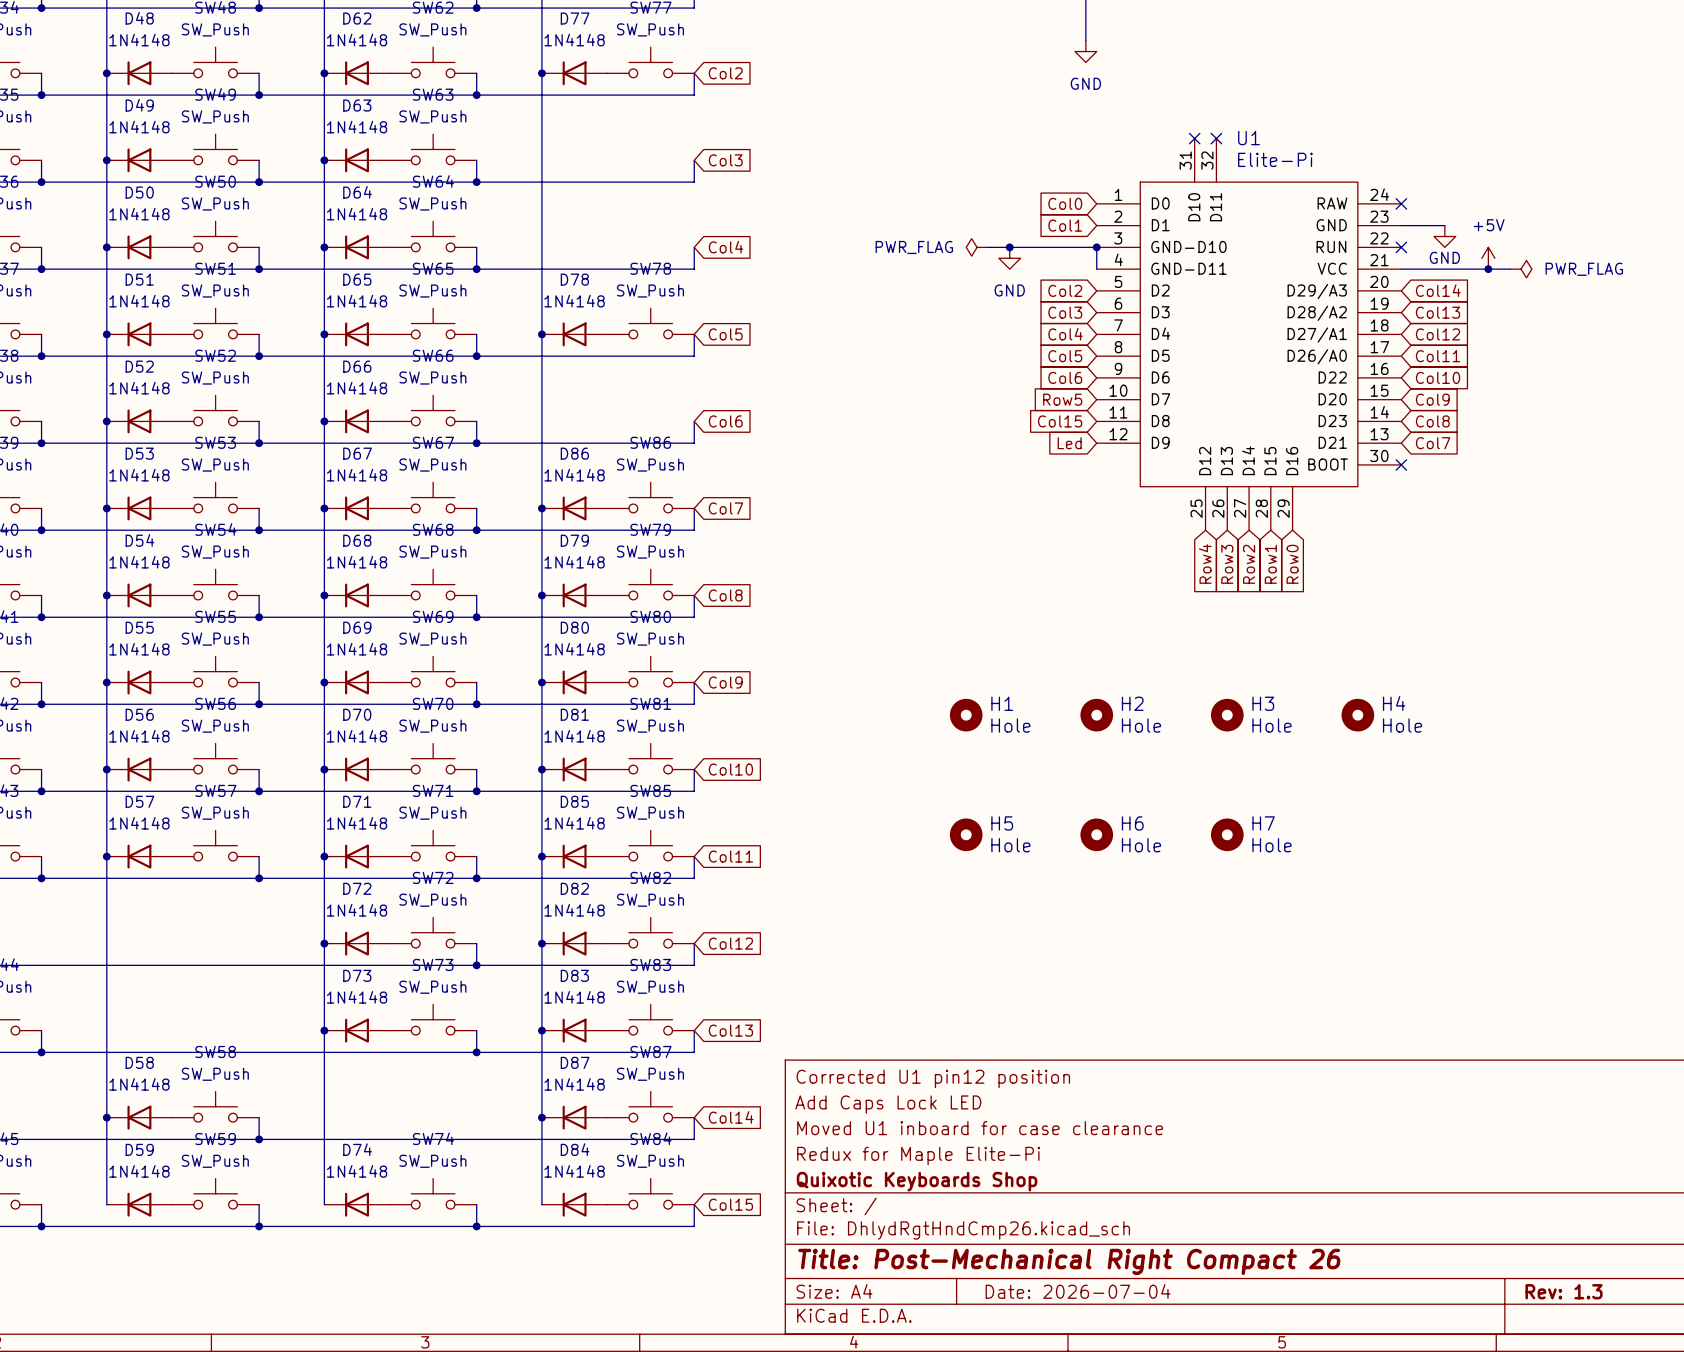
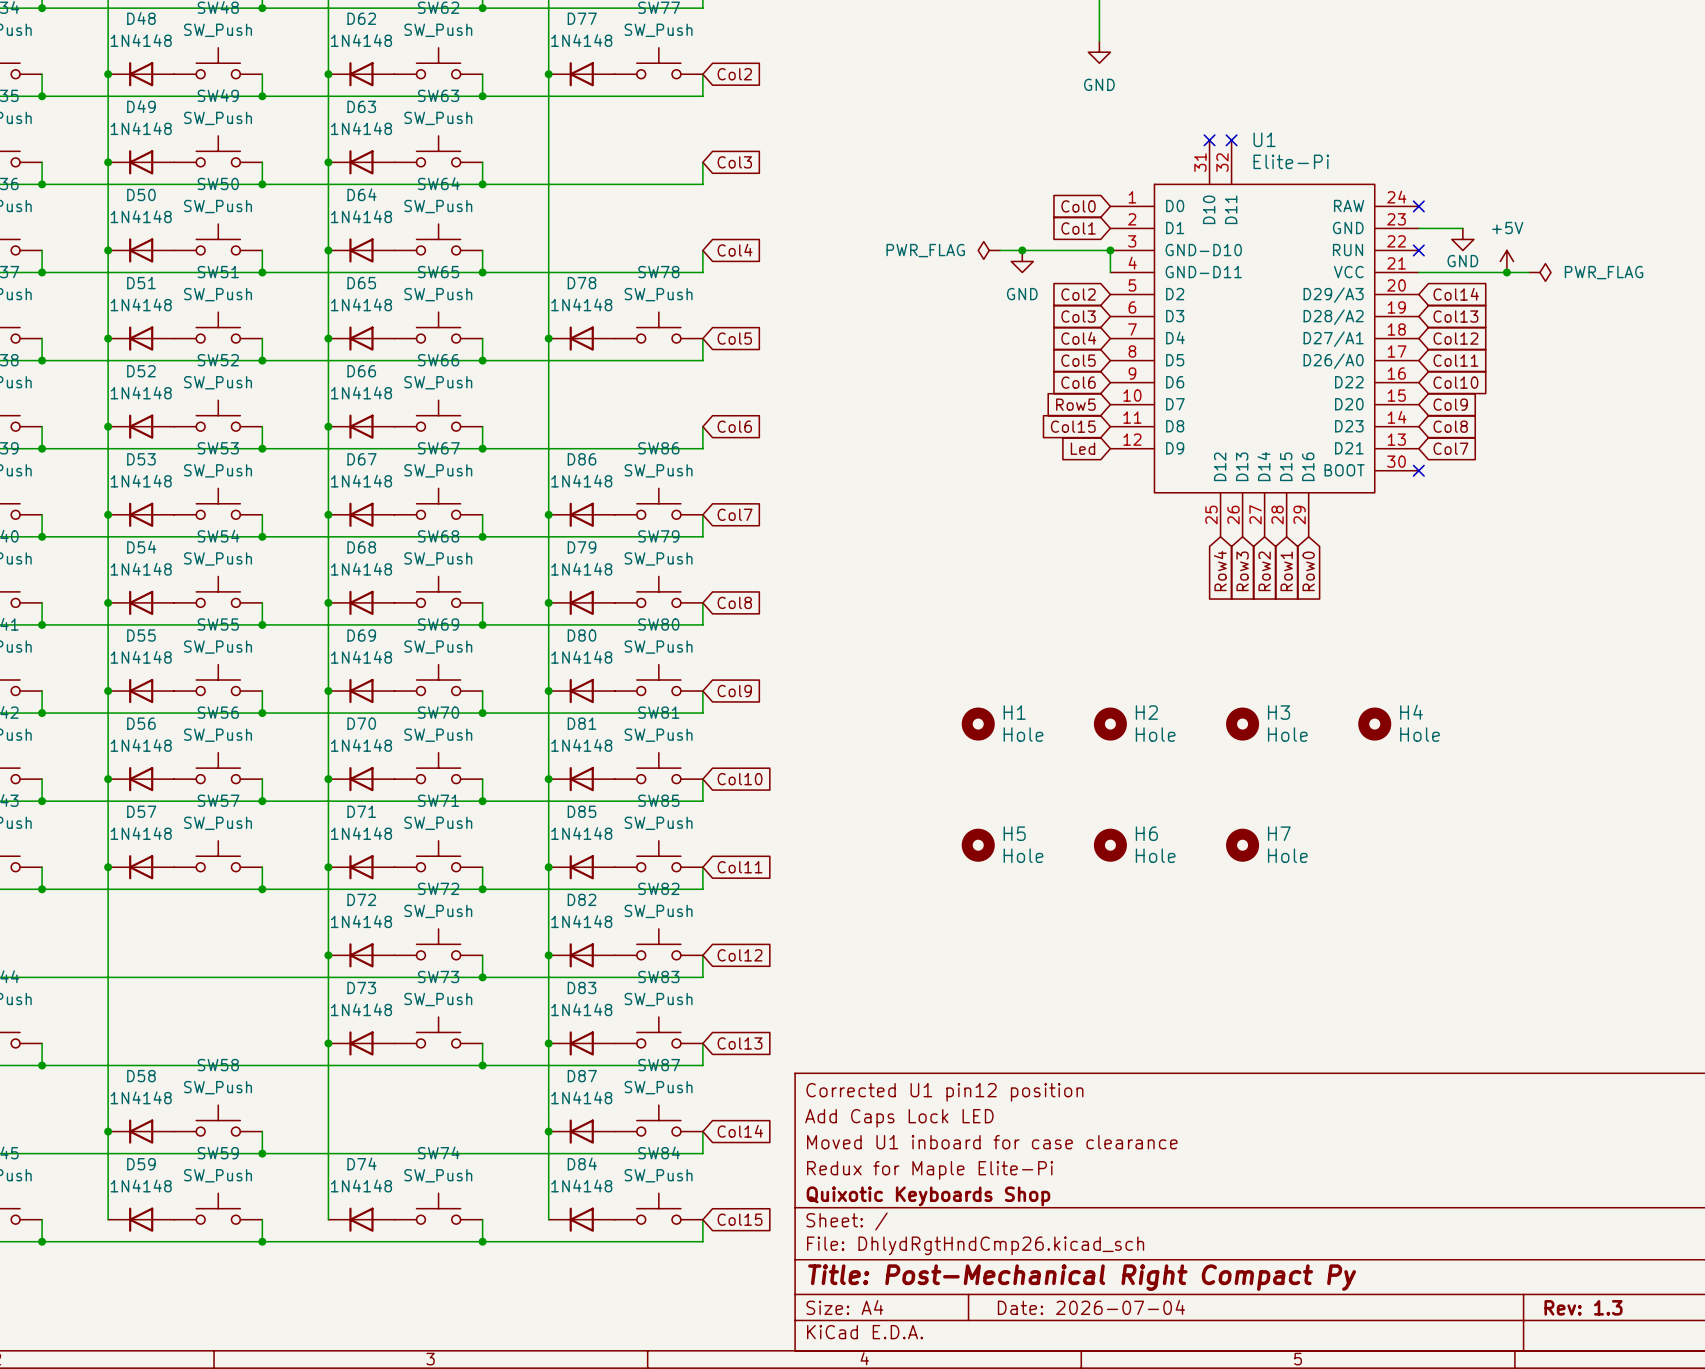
title block: Title: Post-Mechanical Right Compact 26 (1069, 1261) -> Title: Post-Mechanical Right Compact Py (1082, 1277)

